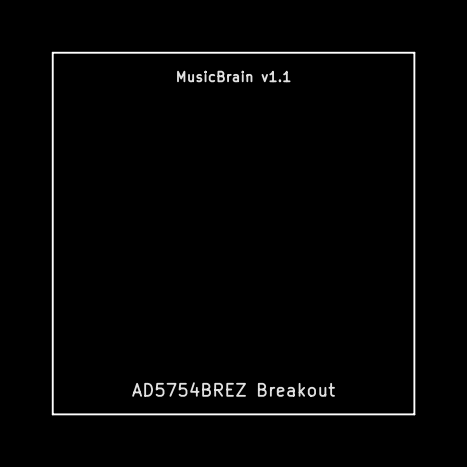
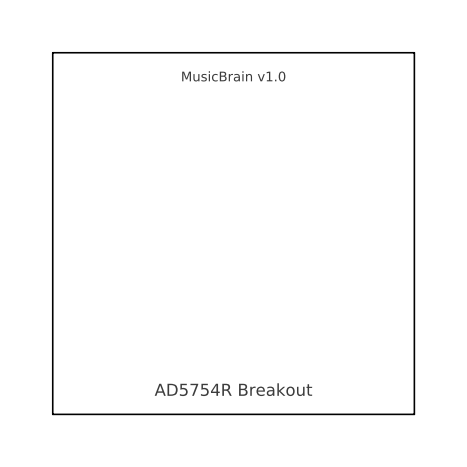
text: MusicBrain v1.1 (233, 76) -> MusicBrain v1.0 (233, 76)
text: AD5754BREZ Breakout (233, 389) -> AD5754R Breakout (233, 389)

